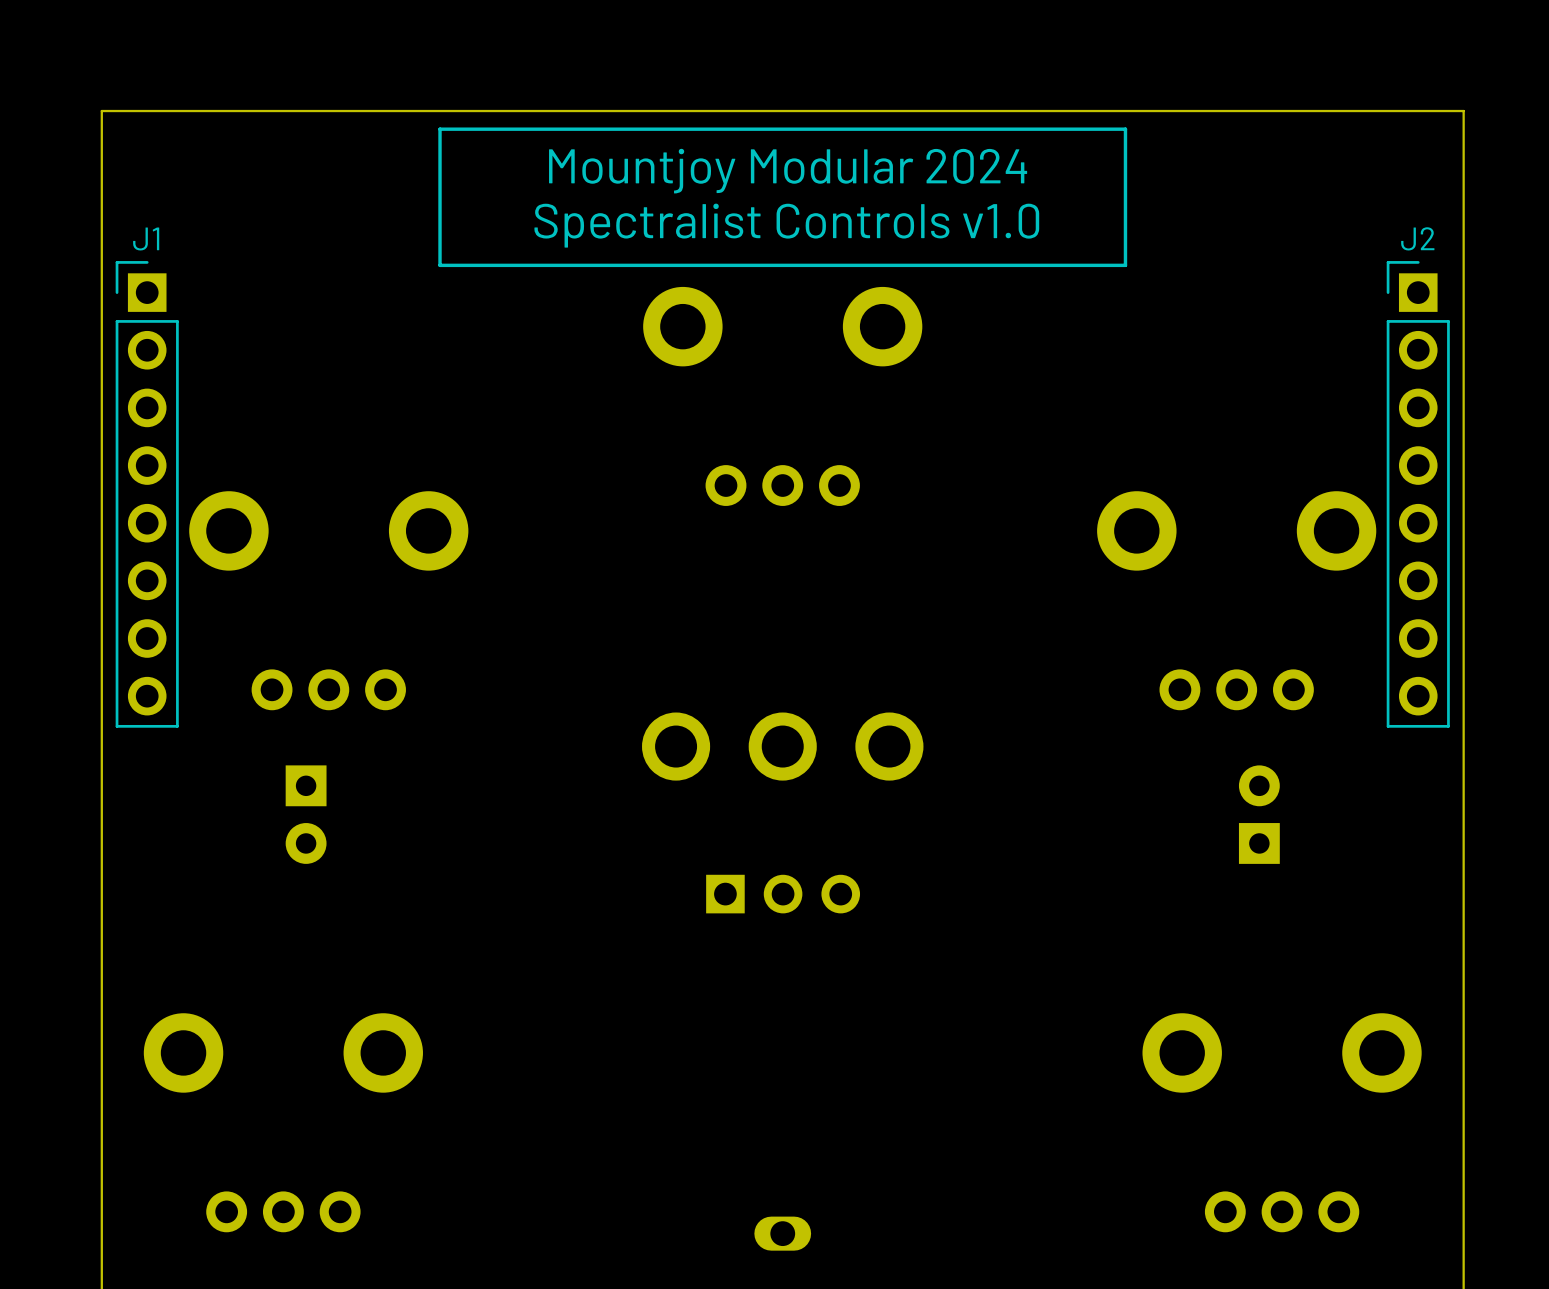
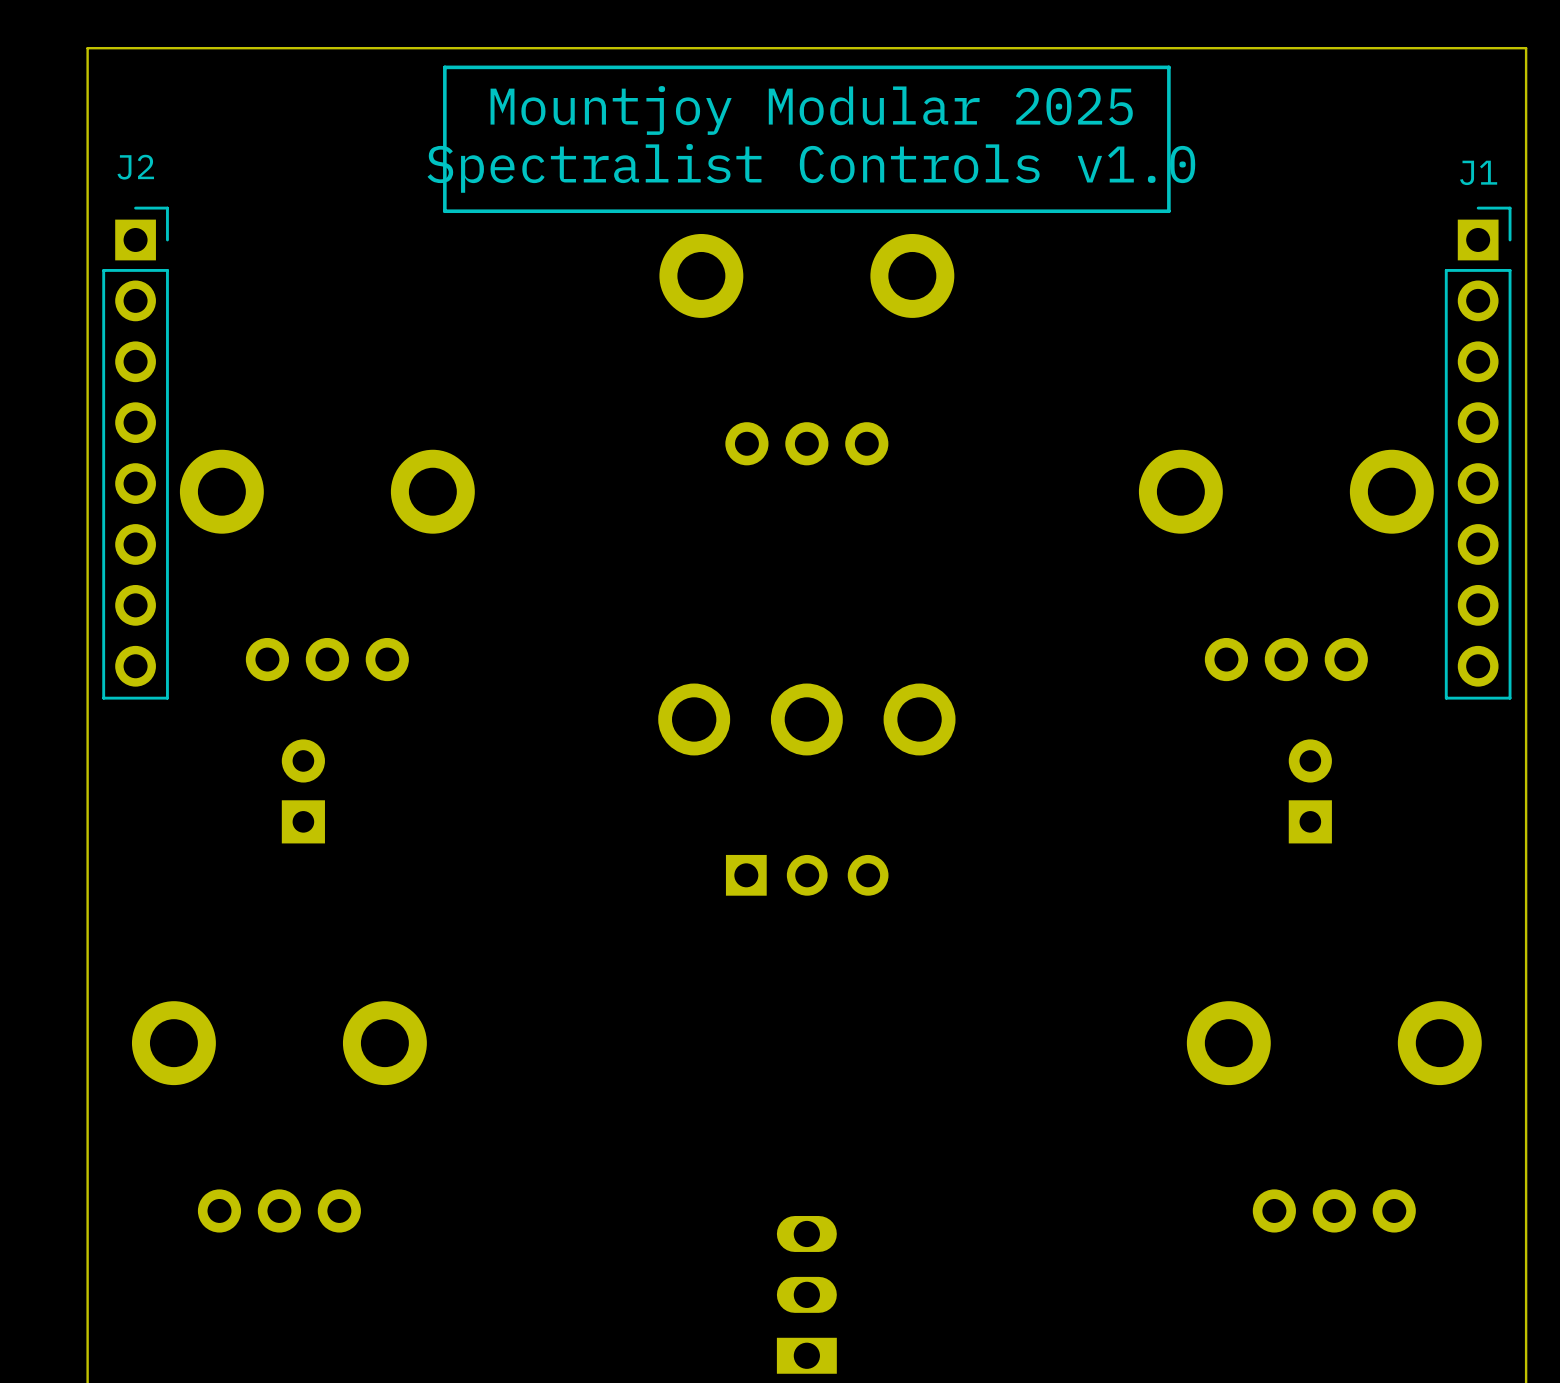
text: Mountjoy Modular 2024 (788, 171) -> Mountjoy Modular 2025 (811, 110)
J1 footprint: [115, 261, 179, 728] -> [1444, 206, 1512, 700]
J2 footprint: [1386, 261, 1450, 728] -> [102, 206, 169, 700]
part rotation: 0° (306, 814) -> 180° (303, 791)

